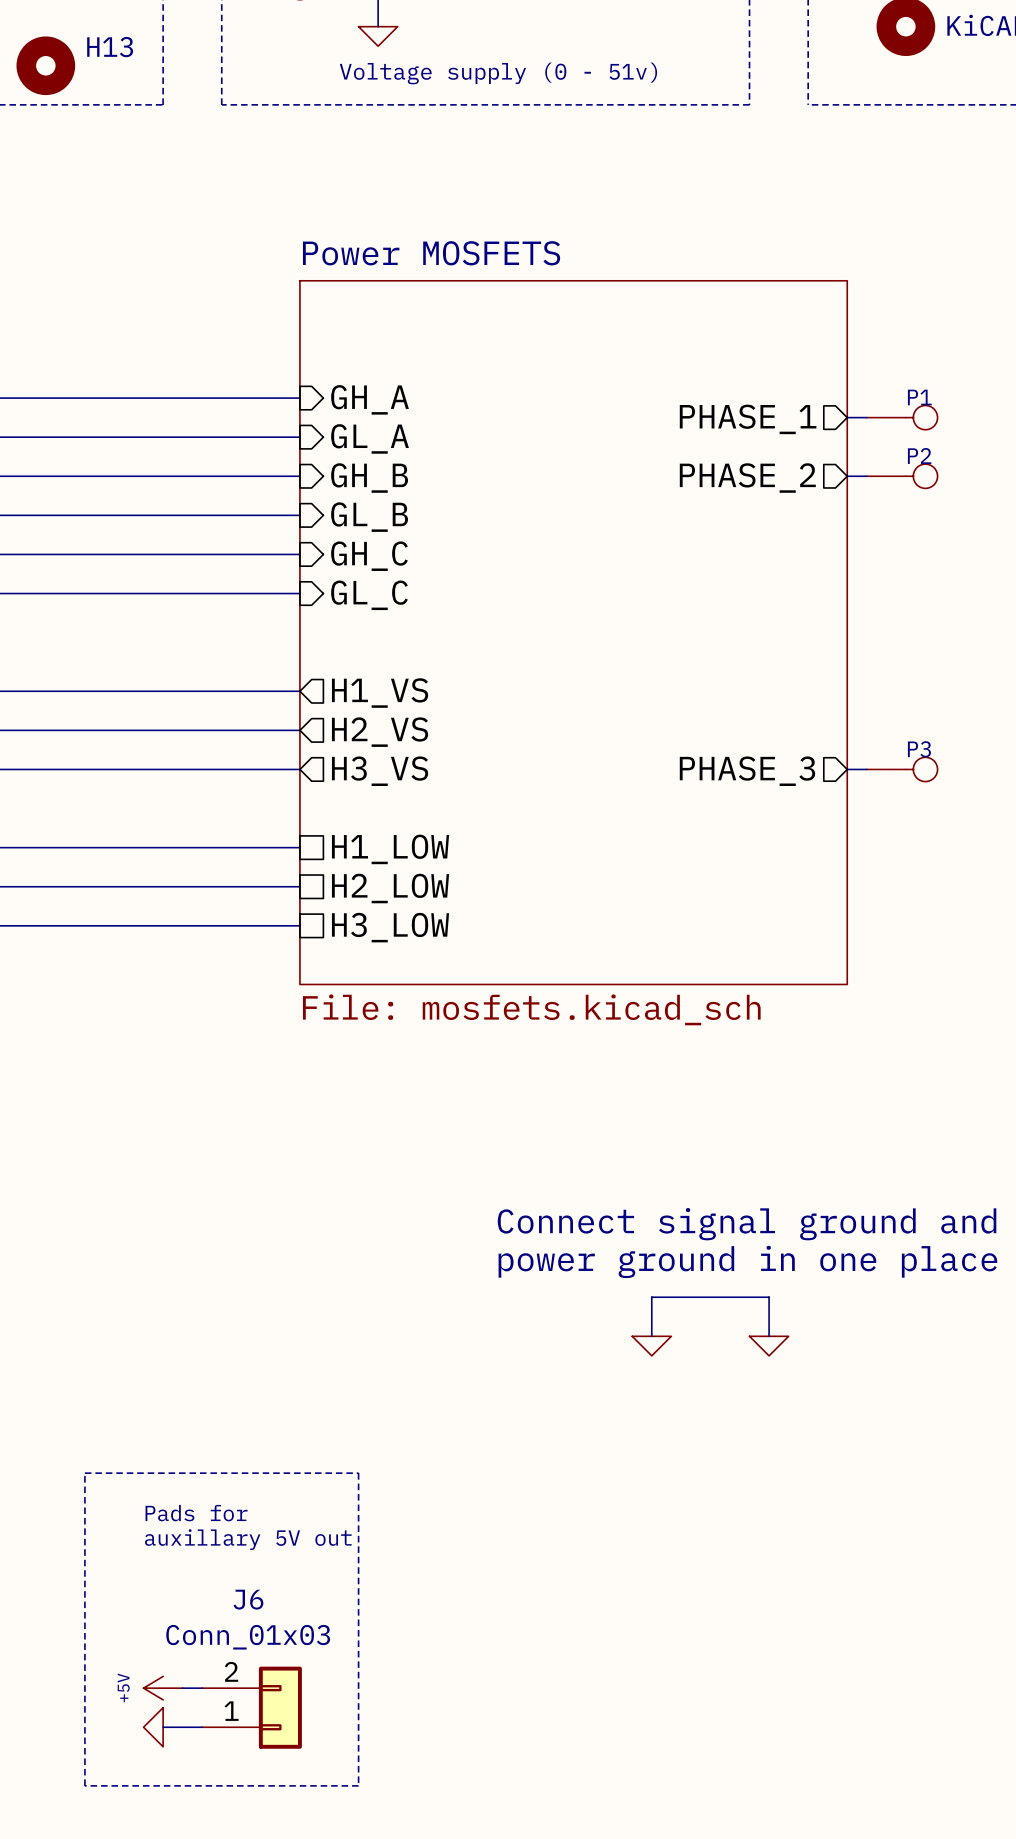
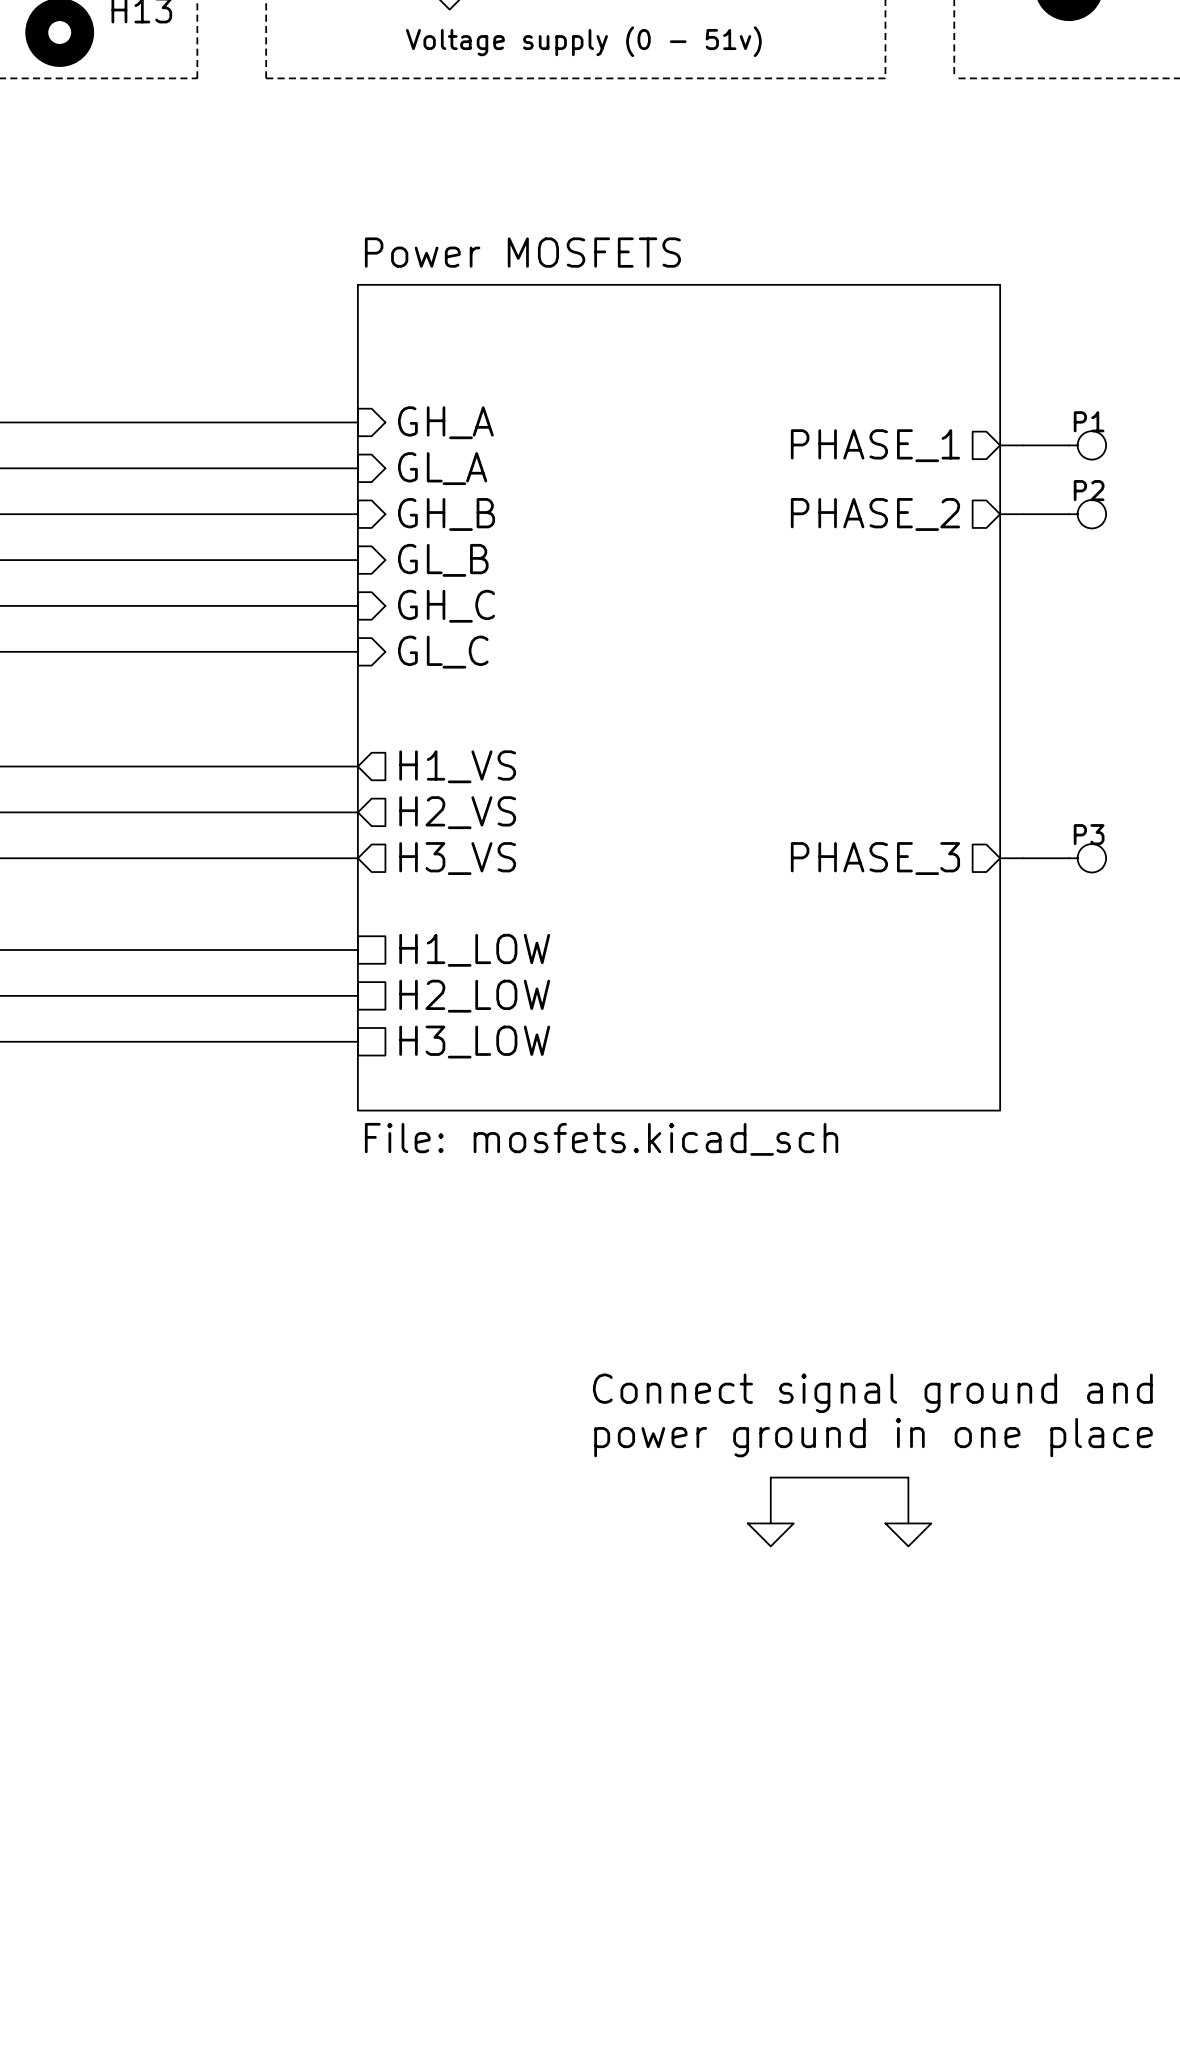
line: (84, 1473) (84, 1785) (358, 1785) (358, 1473) (84, 1473) -> none
text: Pads for (196, 1513) -> none
text: auxillary 5V out (248, 1539) -> none
power symbol: +5V (163, 1688) -> none
wire: (182, 1688) (202, 1688) -> none
J6: Conn_01x03 (252, 1707) -> none
power symbol: (153, 1727) -> none
wire: (163, 1727) (202, 1727) -> none

